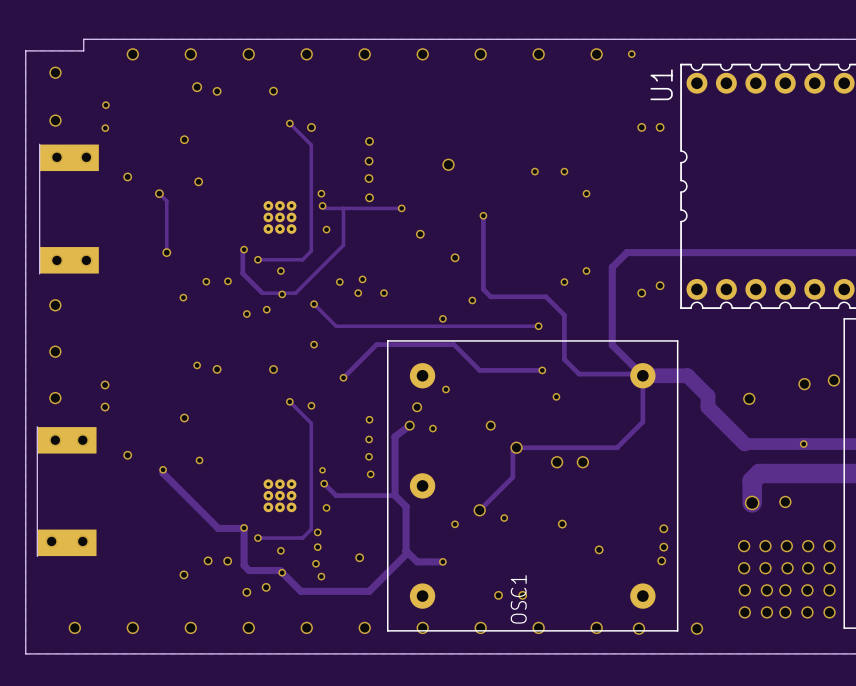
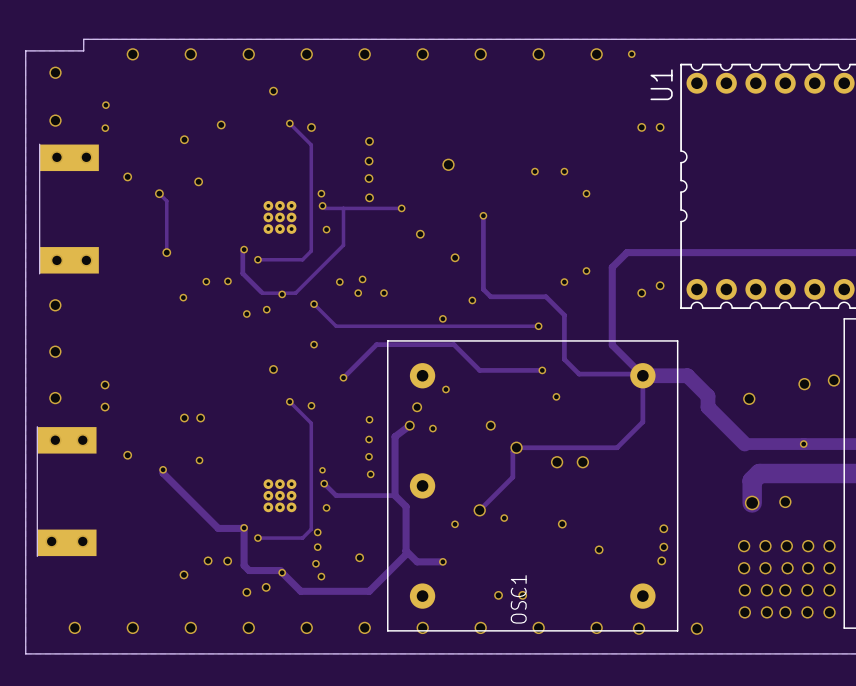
via: (197, 87) -> none
via position: (217, 91) -> (221, 124)
via: (280, 271) -> none
via: (197, 365) -> none
via position: (217, 369) -> (200, 418)
via: (280, 550) -> none

